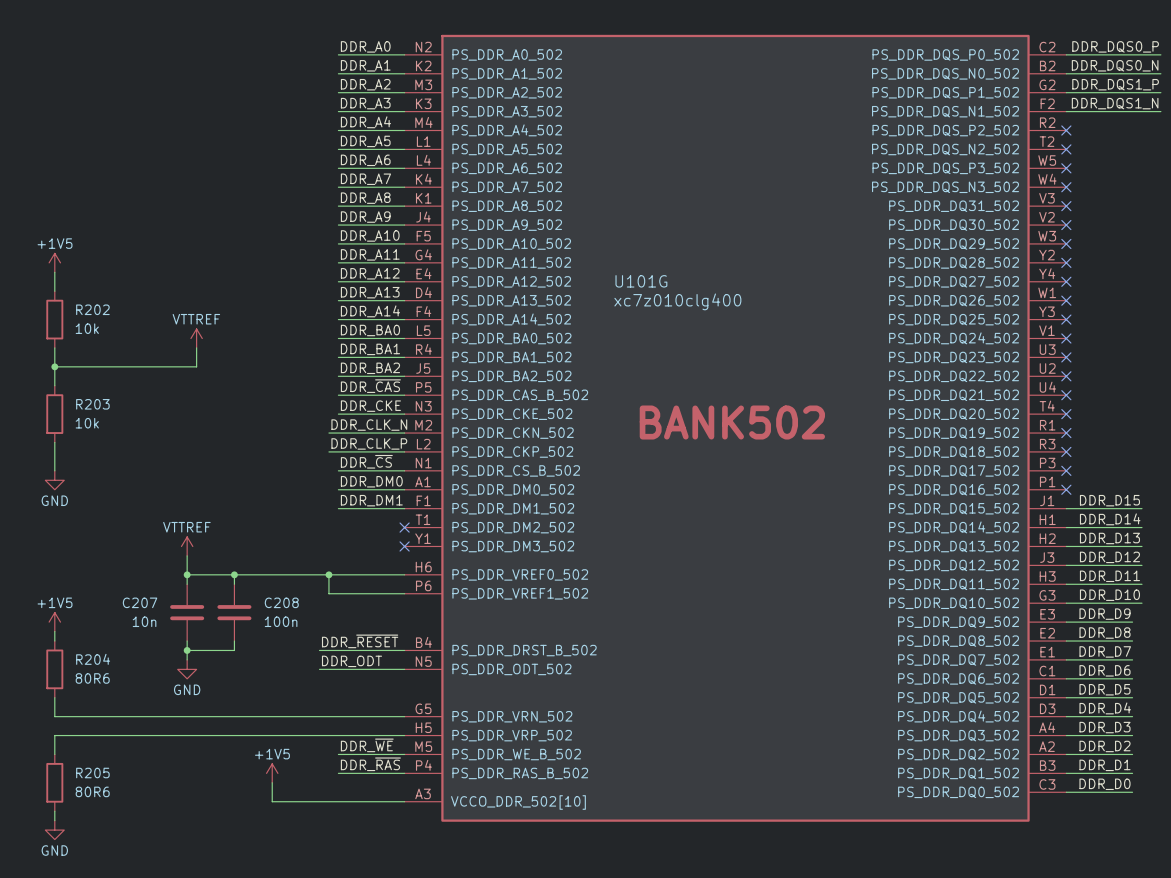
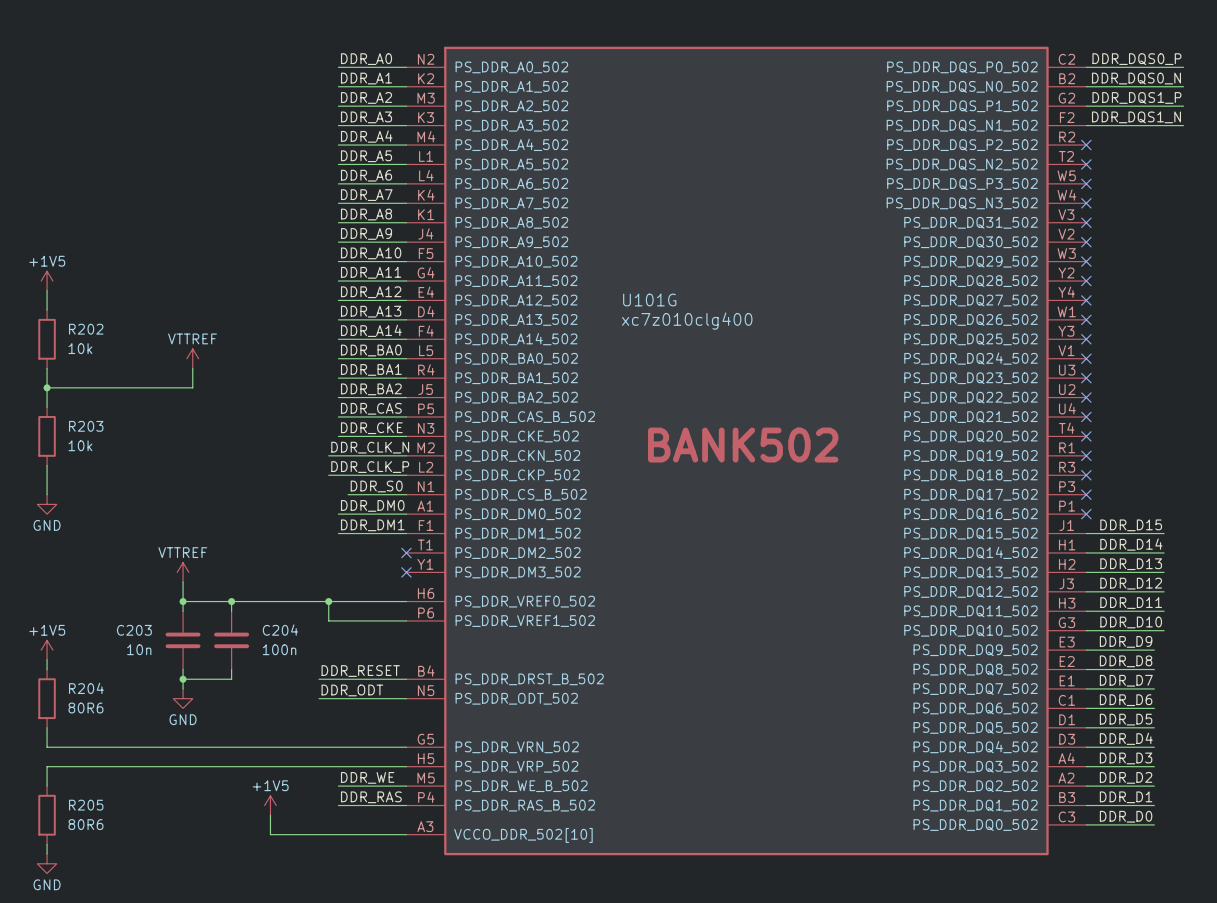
label: DDR_~{CAS} (370, 386) -> DDR_CAS (371, 408)
label: DDR_~{CS} (366, 461) -> DDR_S0 (376, 486)
wire: (338, 470) (347, 470) -> none
C207 name: C207 (140, 602) -> C203 (134, 630)
C208 name: C208 (281, 602) -> C204 (280, 630)
label: DDR_~{RESET} (360, 641) -> DDR_RESET (360, 671)
label: DDR_~{WE} (367, 745) -> DDR_WE (367, 777)
label: DDR_~{RAS} (370, 764) -> DDR_RAS (371, 797)

